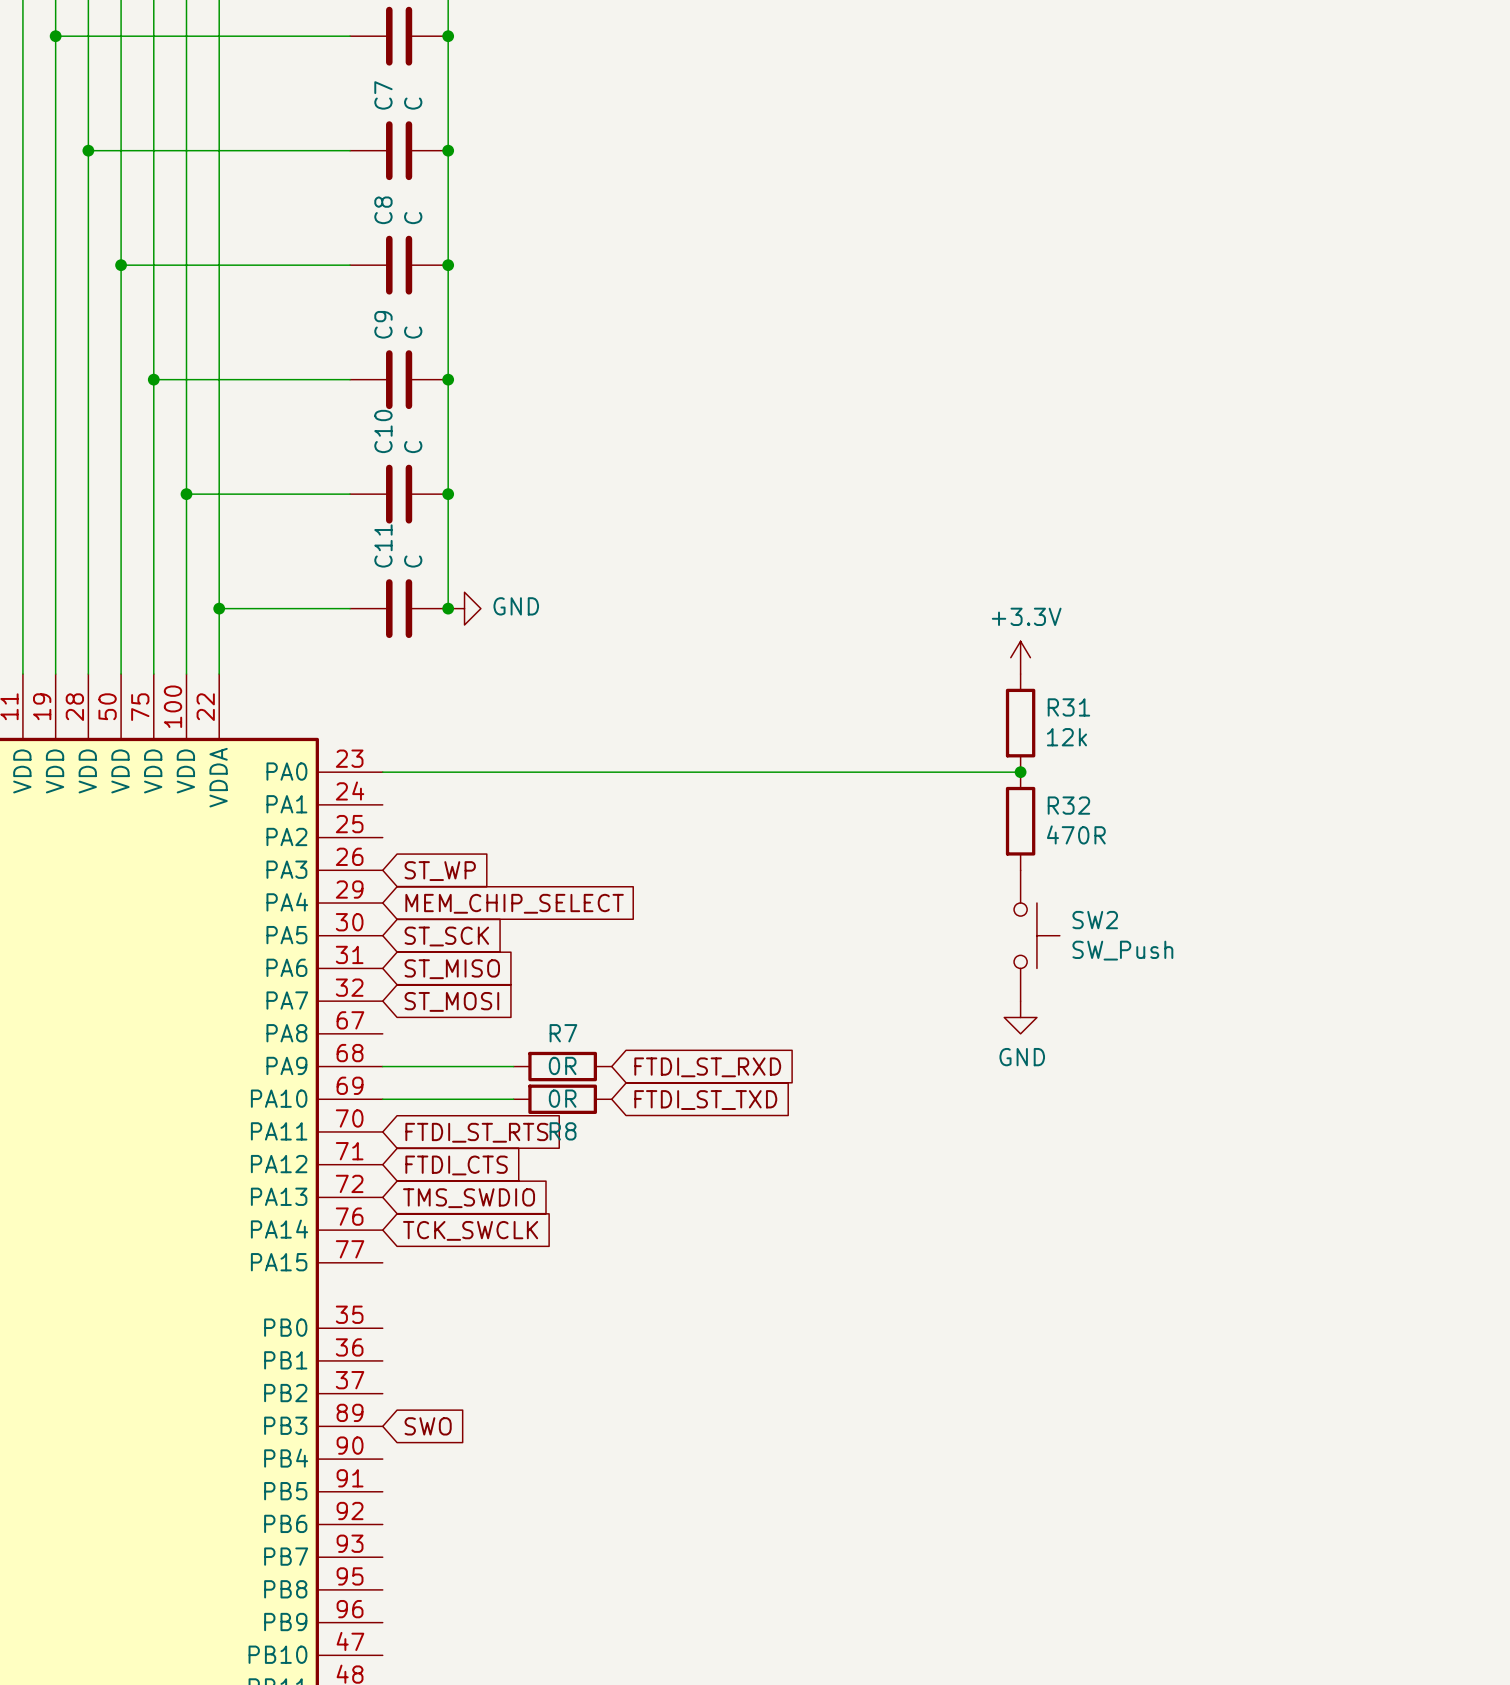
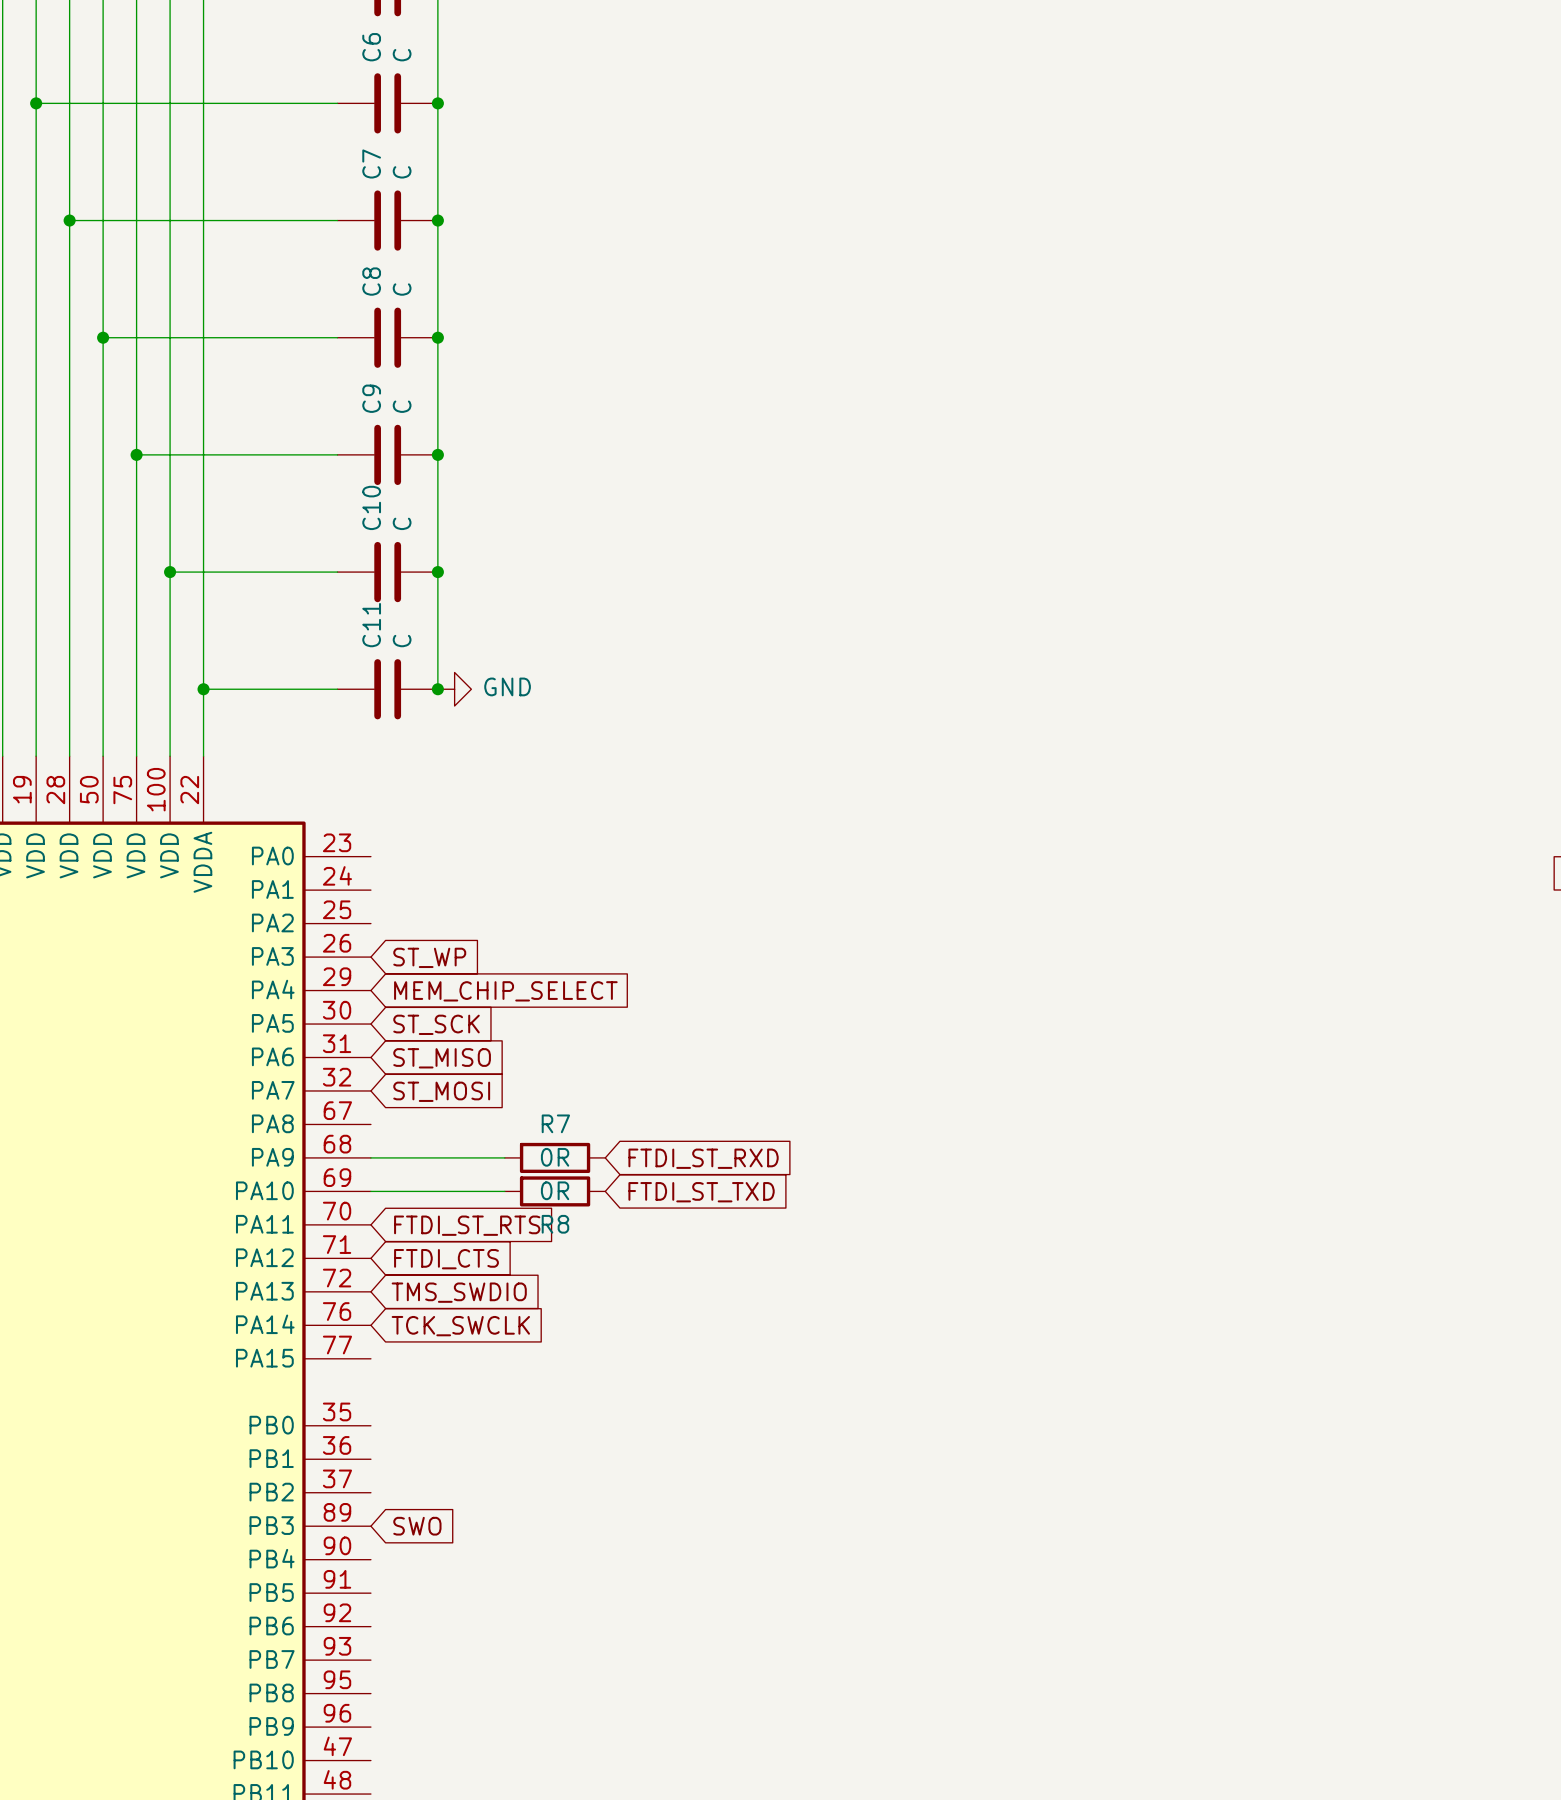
power symbol: +3.3V (1020, 657) -> none
R31: 12k (1020, 723) -> none
wire: (382, 772) (1020, 772) -> none
junction: (1020, 772) -> none
R32: 470R (1020, 821) -> none
SW2: SW_Push (1036, 935) -> none
power symbol: GND (1020, 1017) -> none

